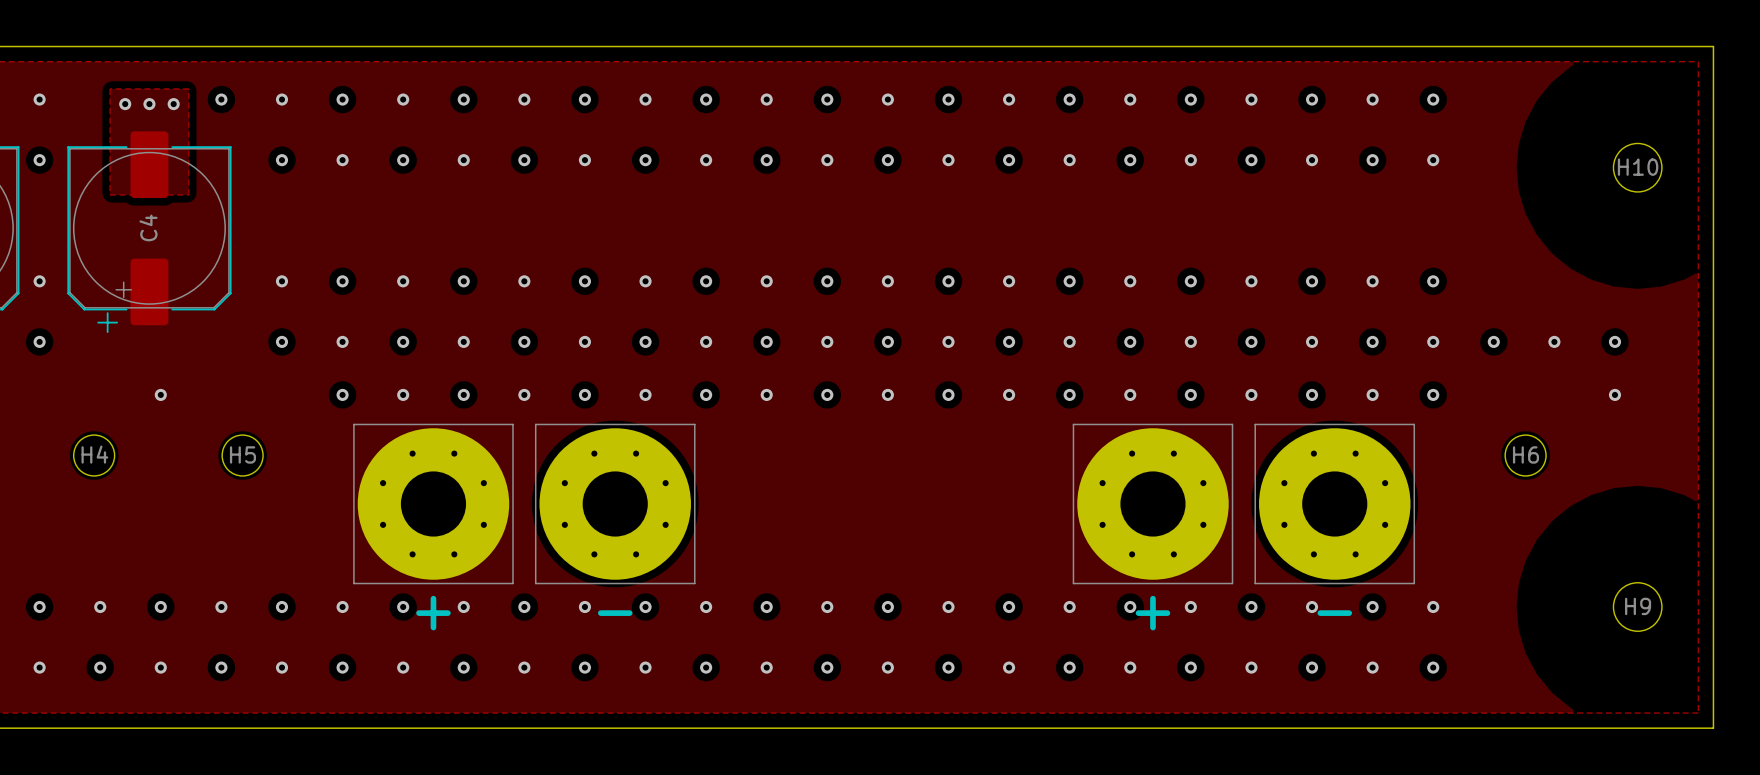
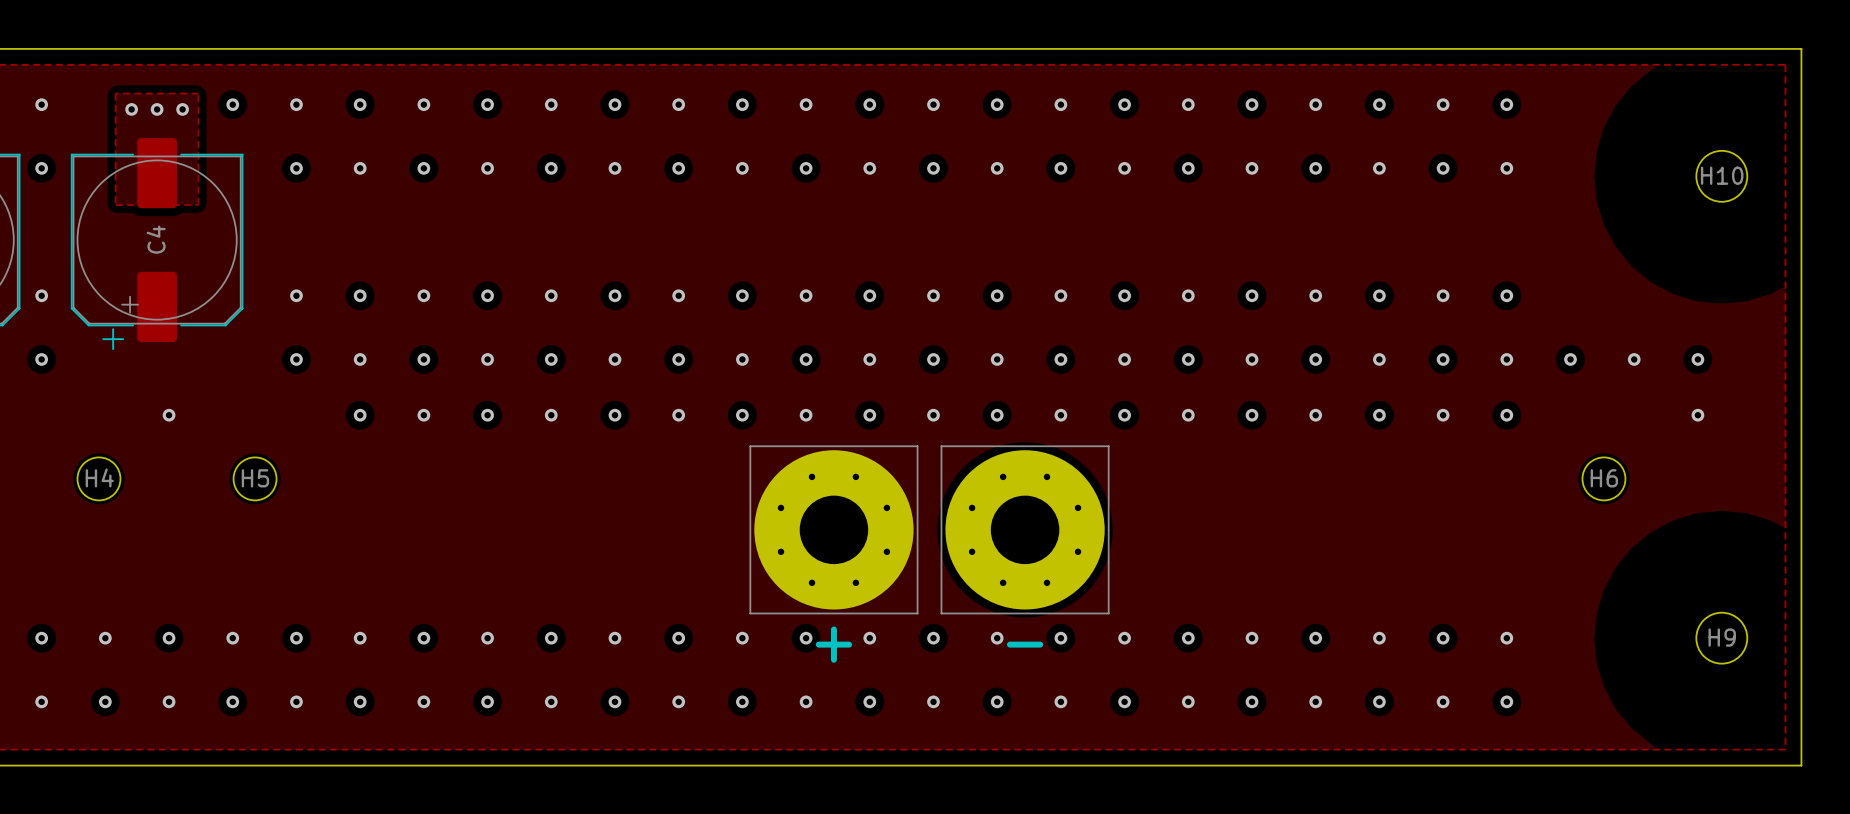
part: (433, 503) -> none
part position: (615, 503) -> (833, 529)
part position: (1152, 503) -> (1025, 529)
part: (1334, 503) -> none
text: + (433, 613) -> none
text: - (615, 613) -> none
text: none -> + (833, 644)
text: none -> - (1025, 644)
text: + (1152, 613) -> none
text: - (1334, 613) -> none

